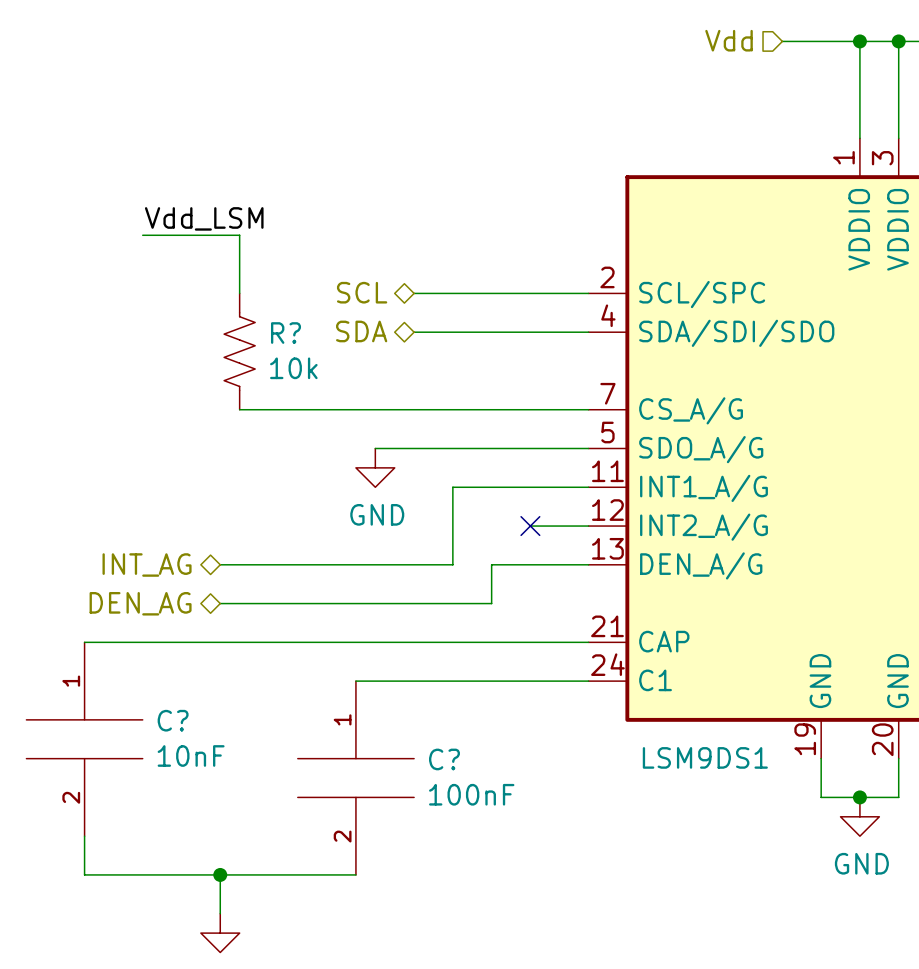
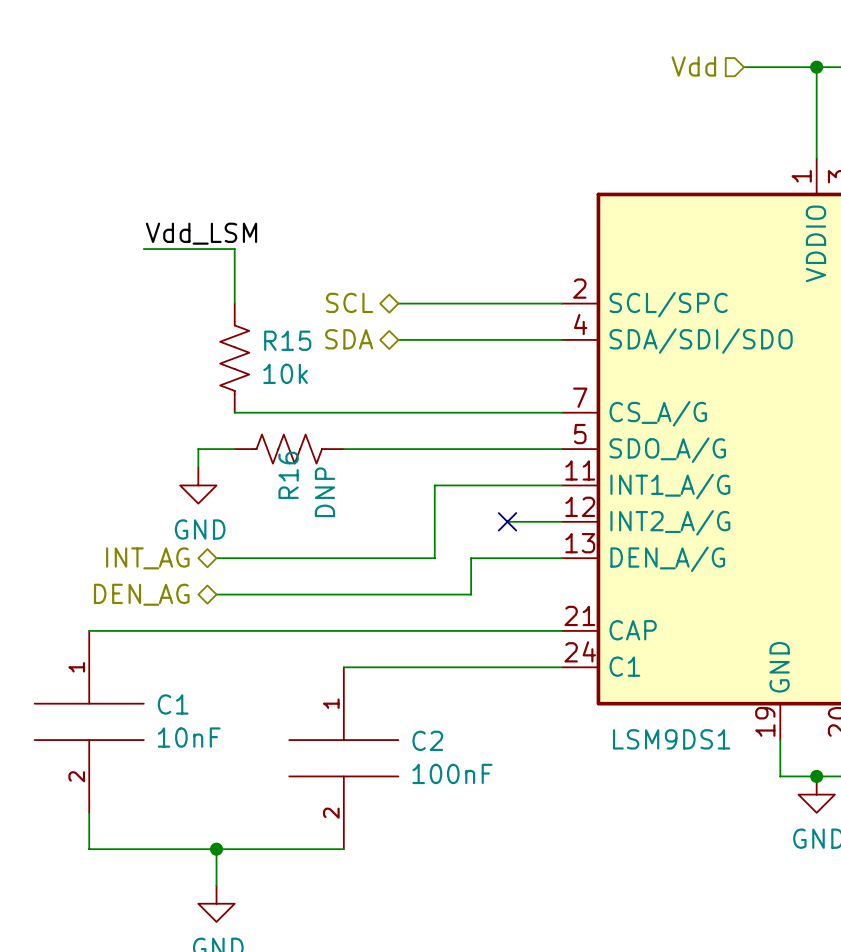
R? name: R? (286, 333) -> R15 (287, 340)
wire: none -> (234, 449) (198, 449) (198, 467)
R16: none -> DNP (289, 449)
wire: none -> (343, 449) (362, 449)
power symbol position: GND (375, 467) -> GND (198, 485)
C? name: C? (173, 720) -> C1 (173, 704)
C? name: C? (444, 759) -> C2 (427, 740)

